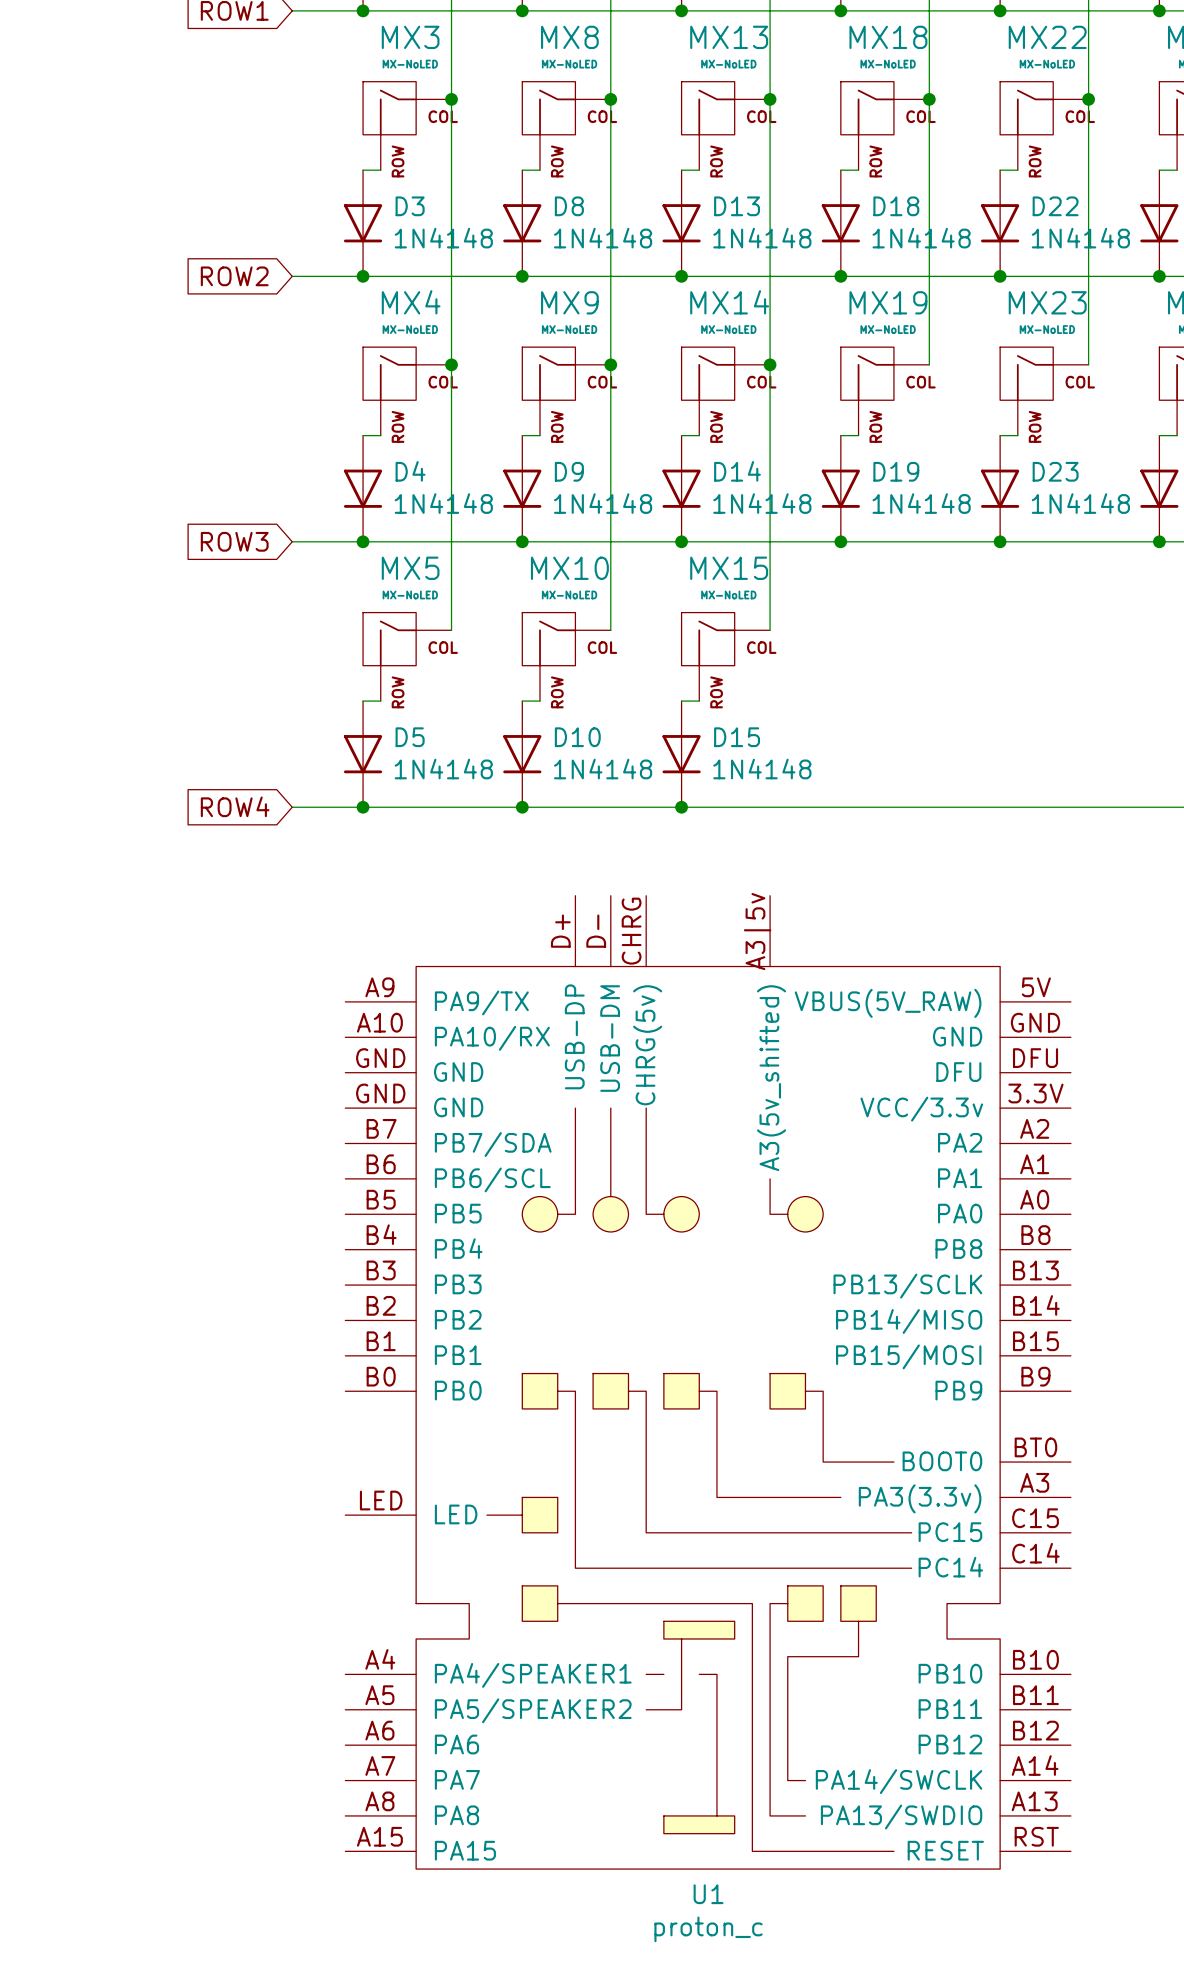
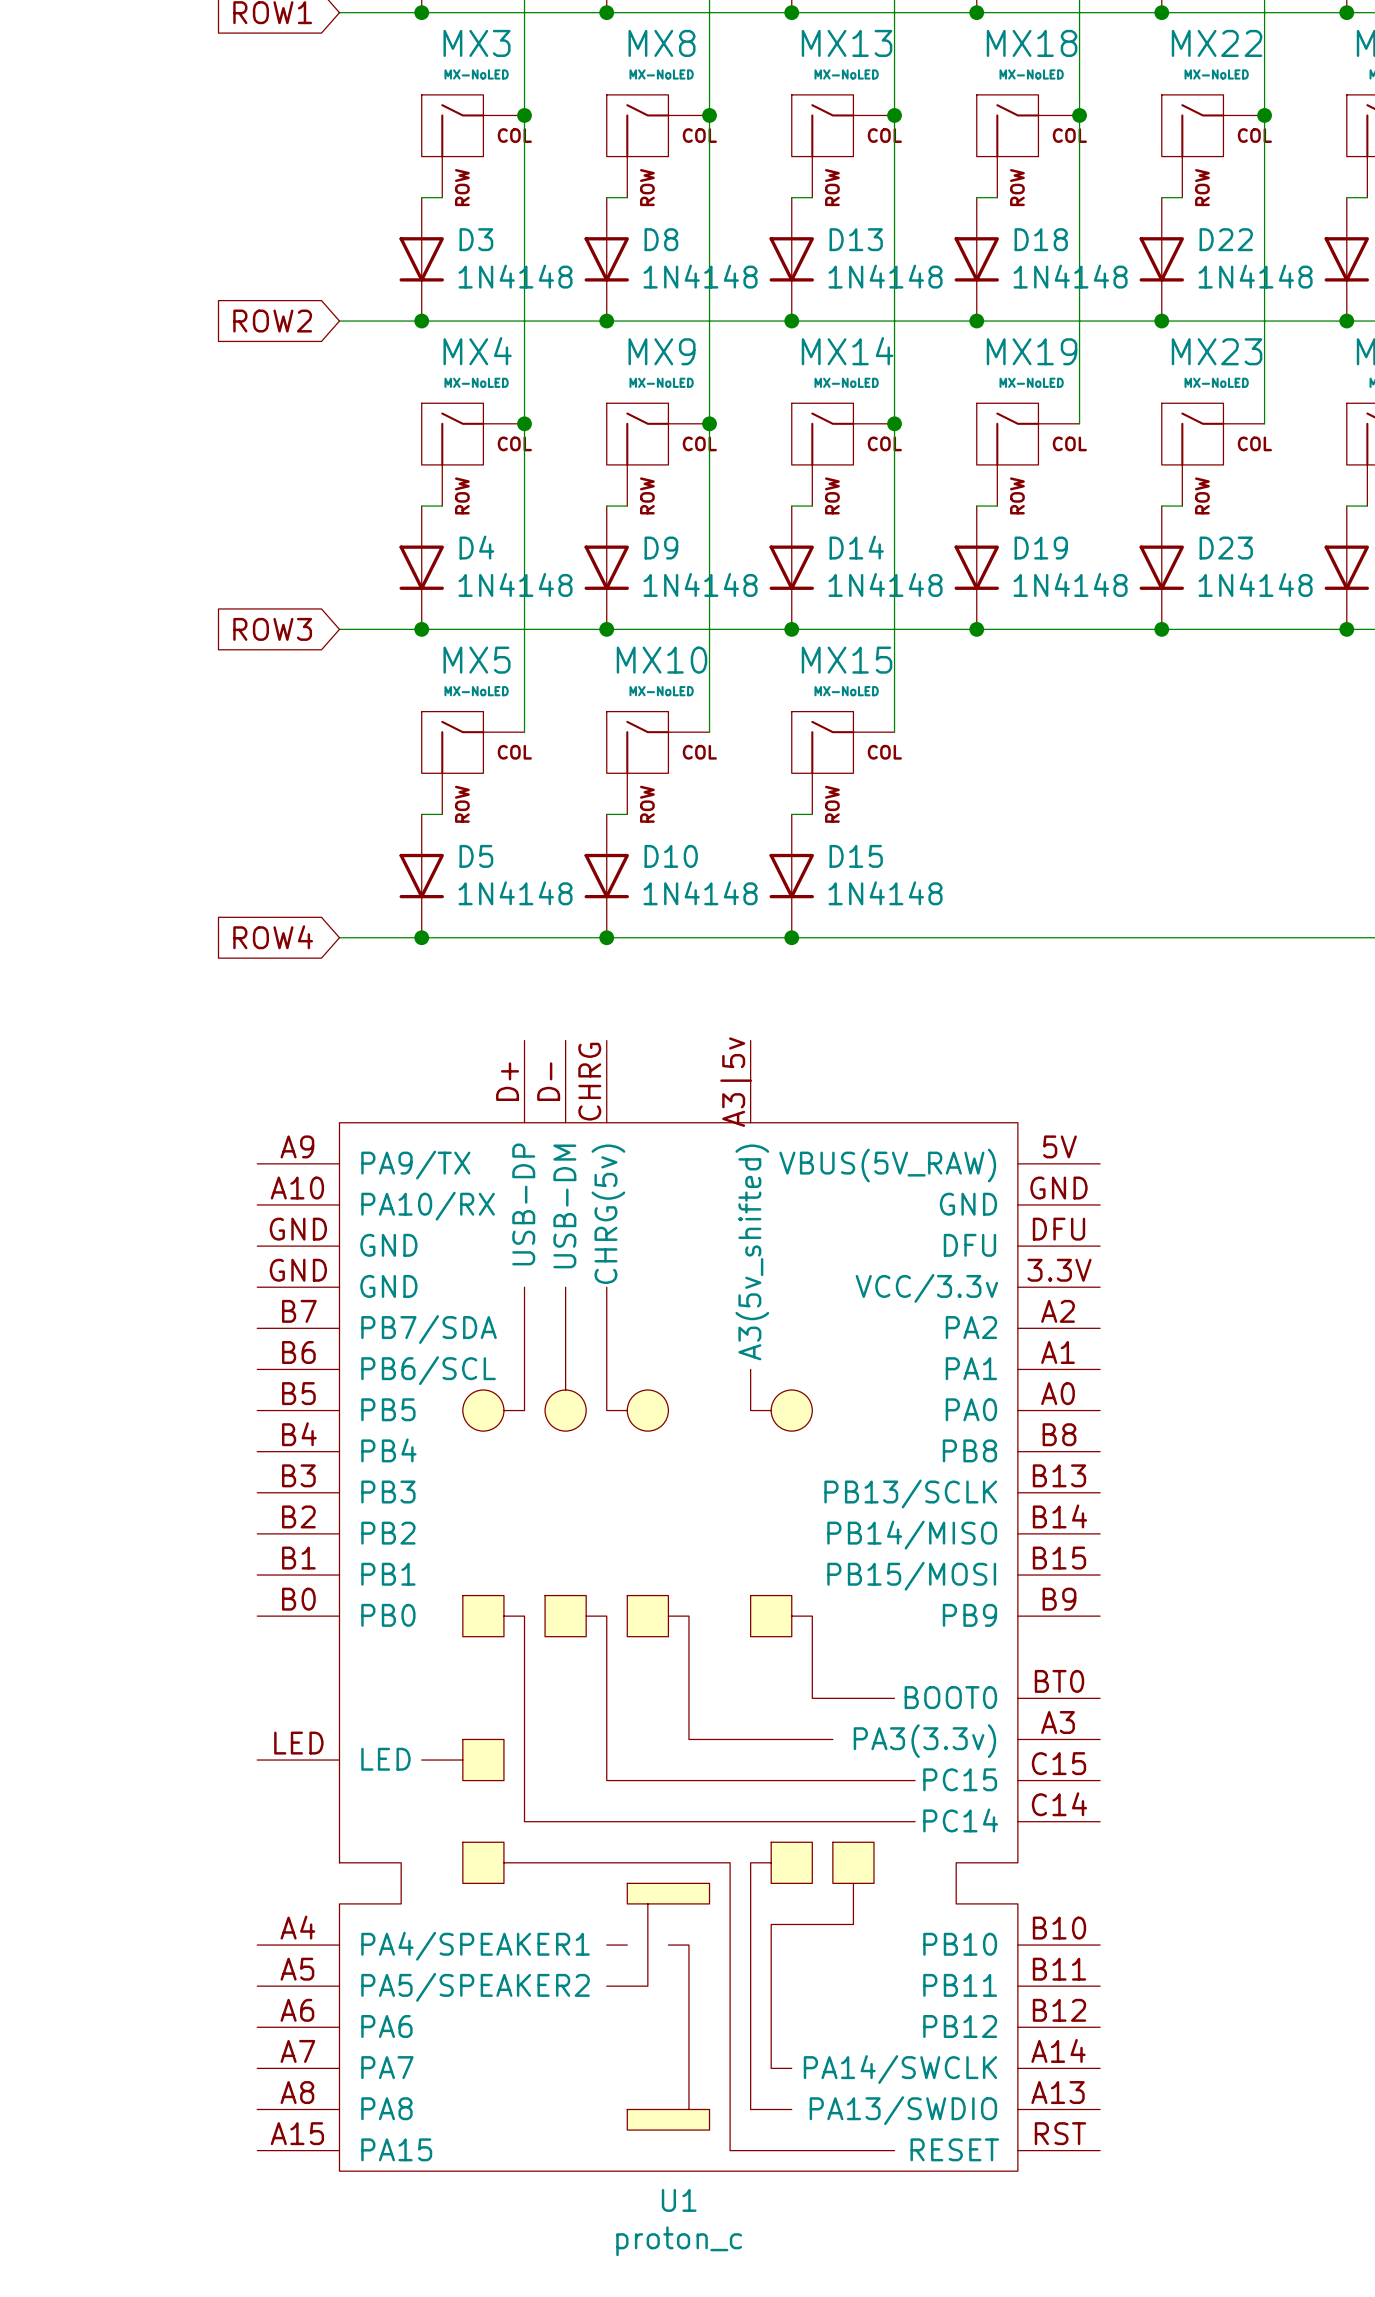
U1 position: (708, 1382) -> (678, 1605)

